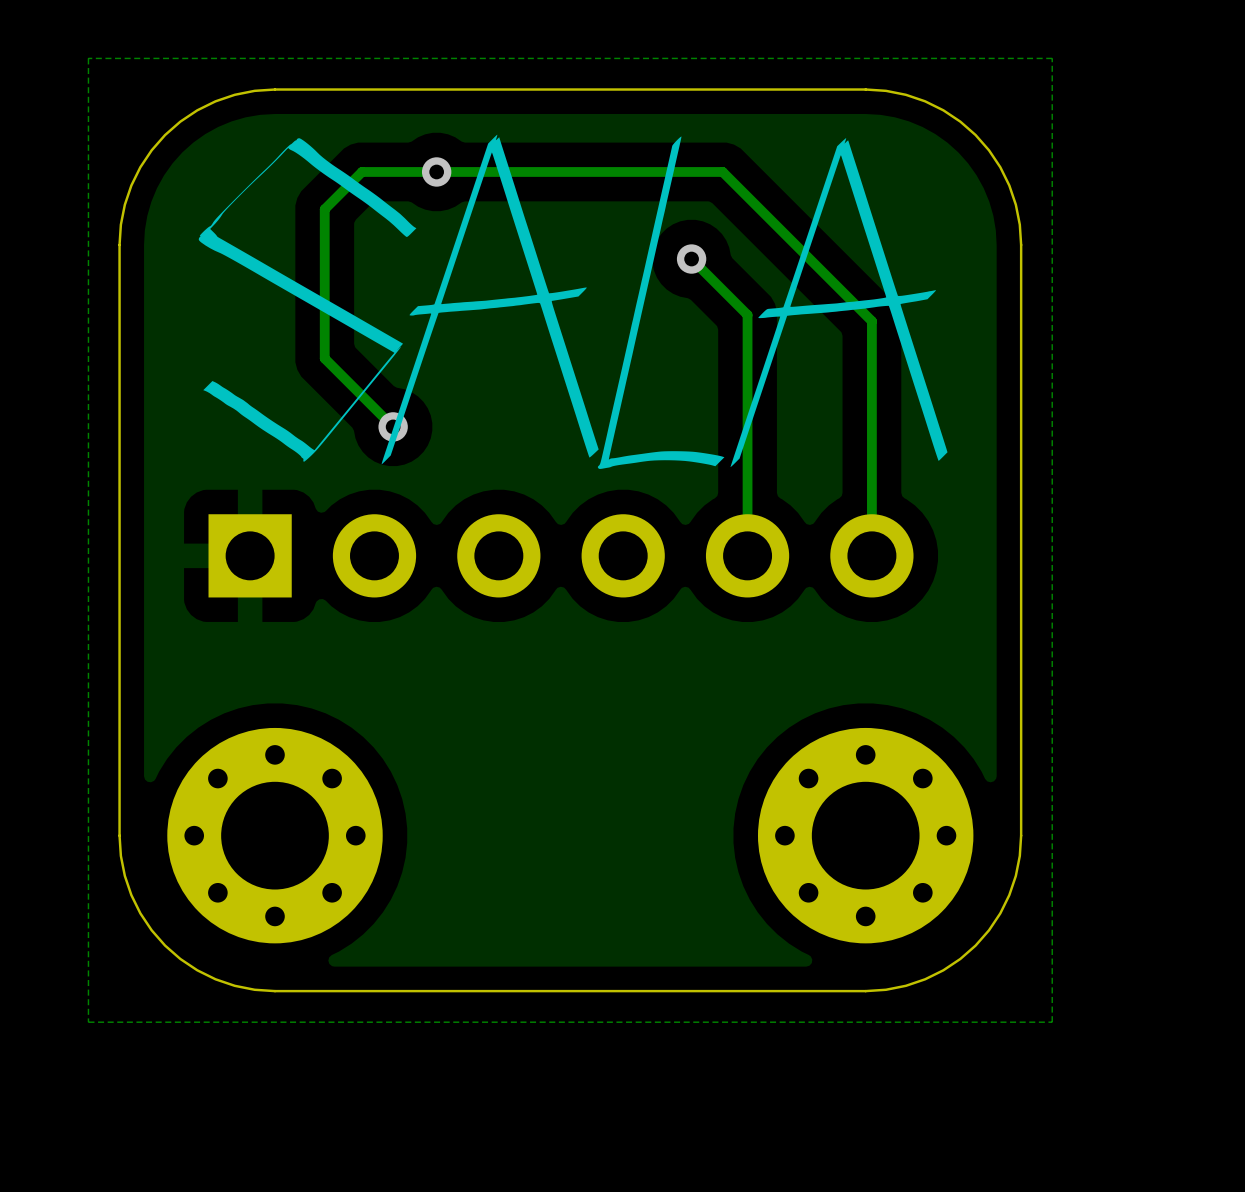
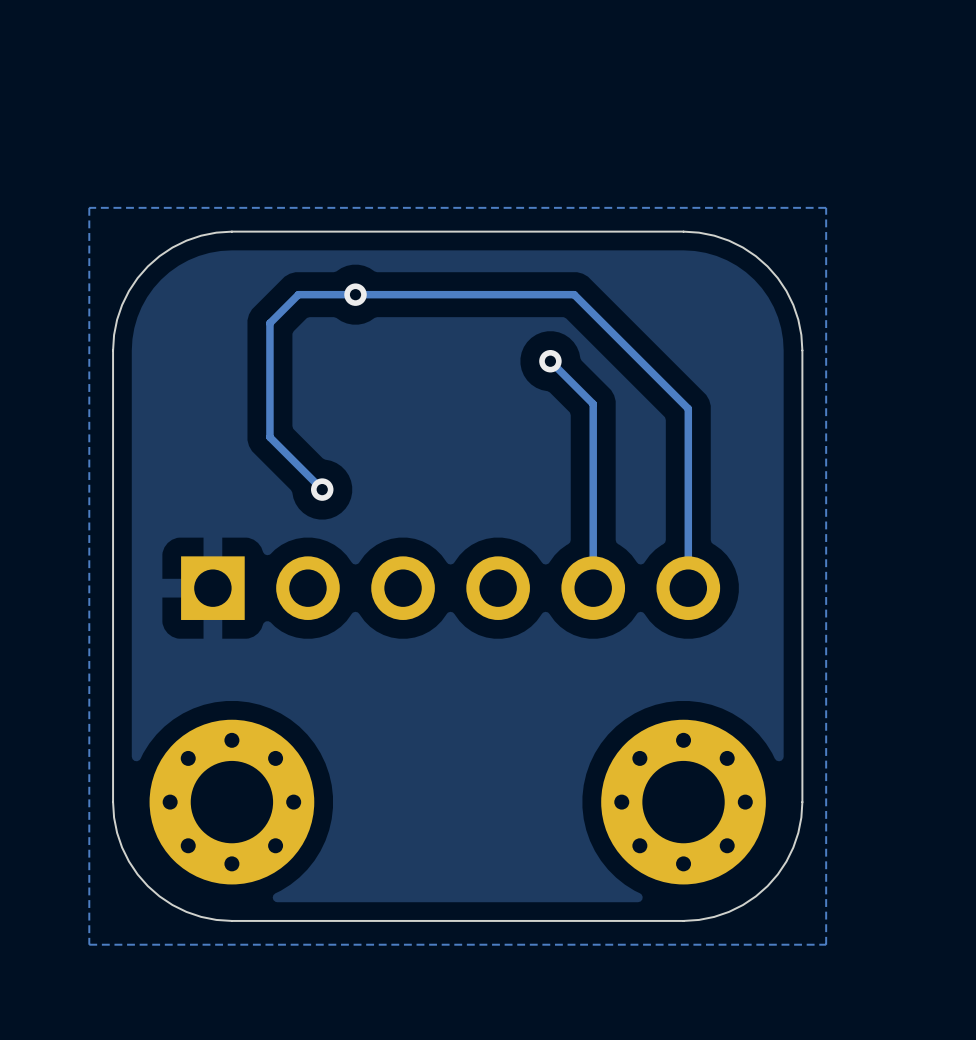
drawing: [198, 134, 948, 469] -> none

